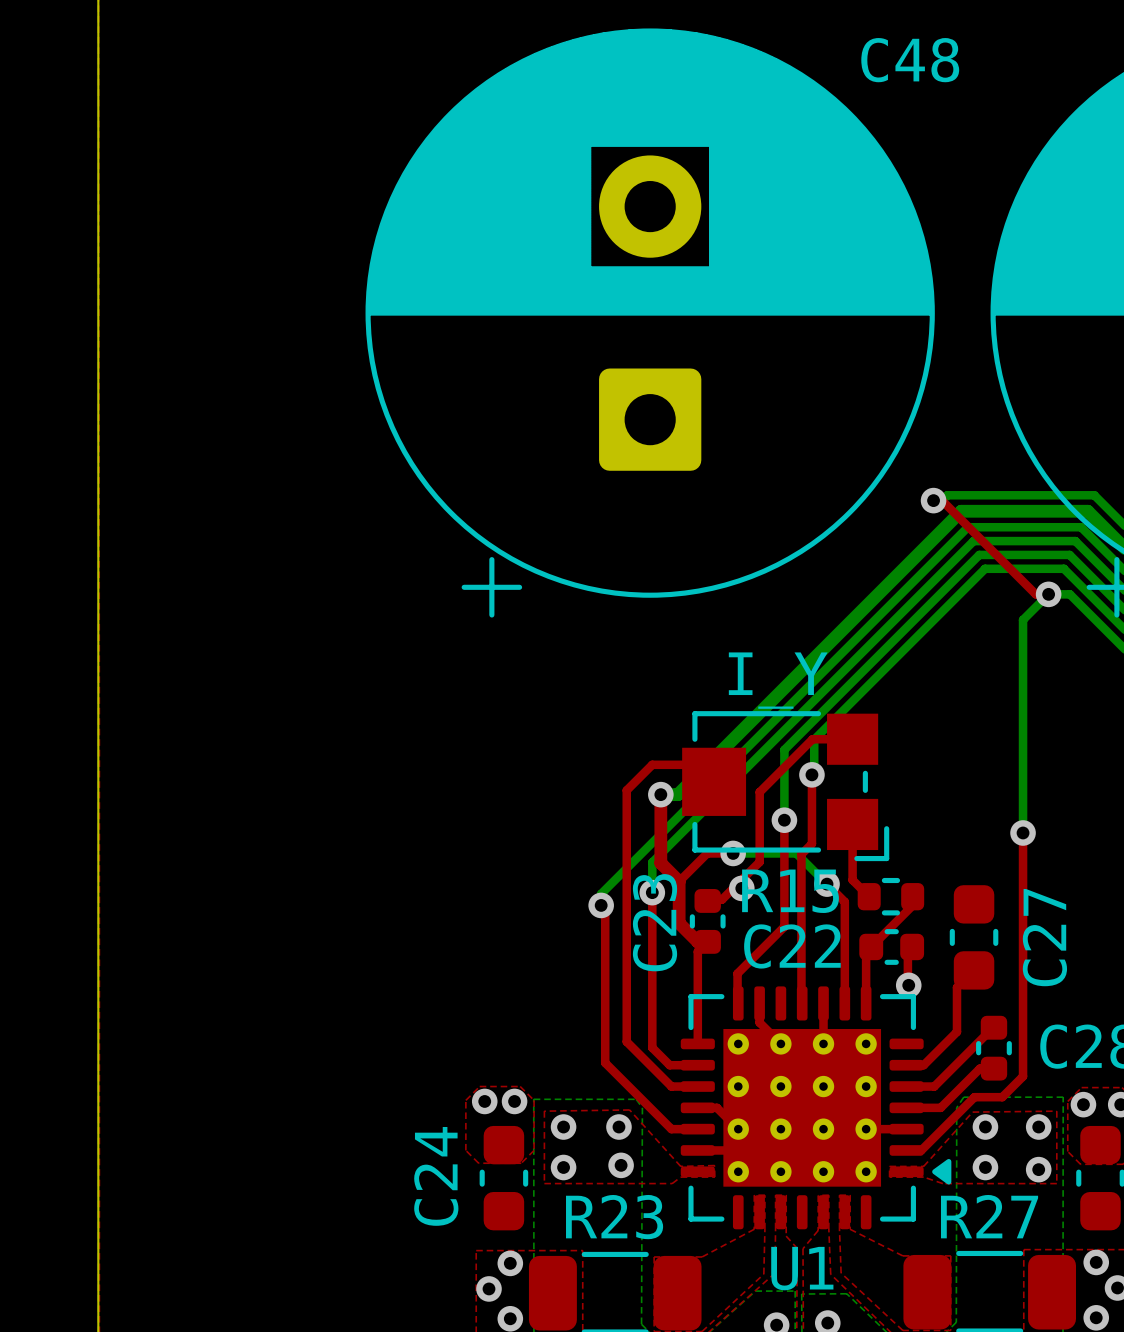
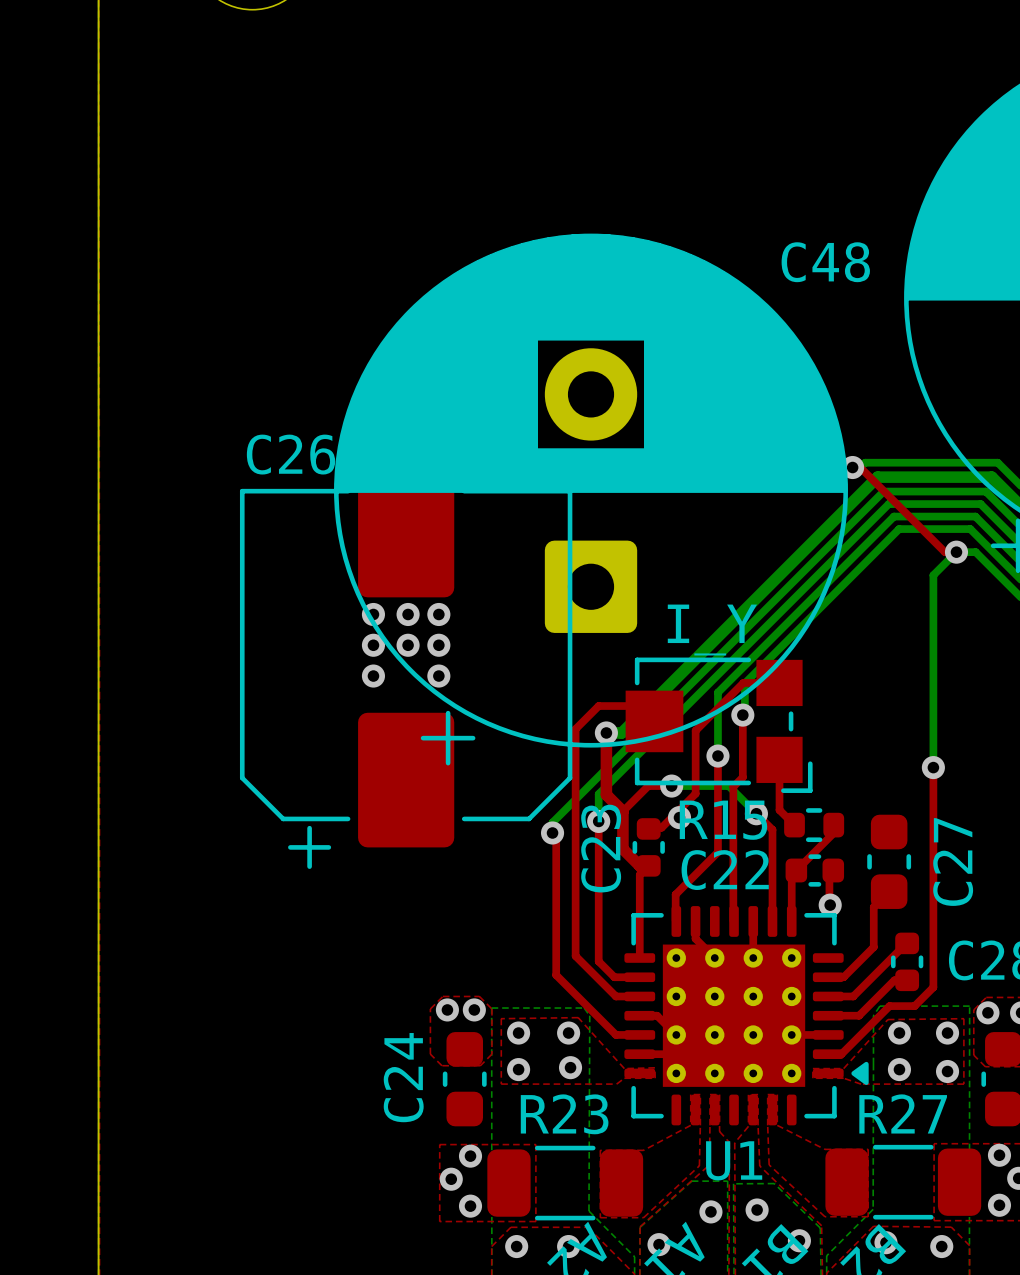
C48 position: (650, 323) -> (591, 499)
via: none -> (373, 614)
via: none -> (408, 614)
via: none -> (438, 614)
via: none -> (373, 645)
via: none -> (408, 645)
via: none -> (438, 645)
C26: none -> (406, 665)
via: none -> (373, 676)
via: none -> (438, 676)

